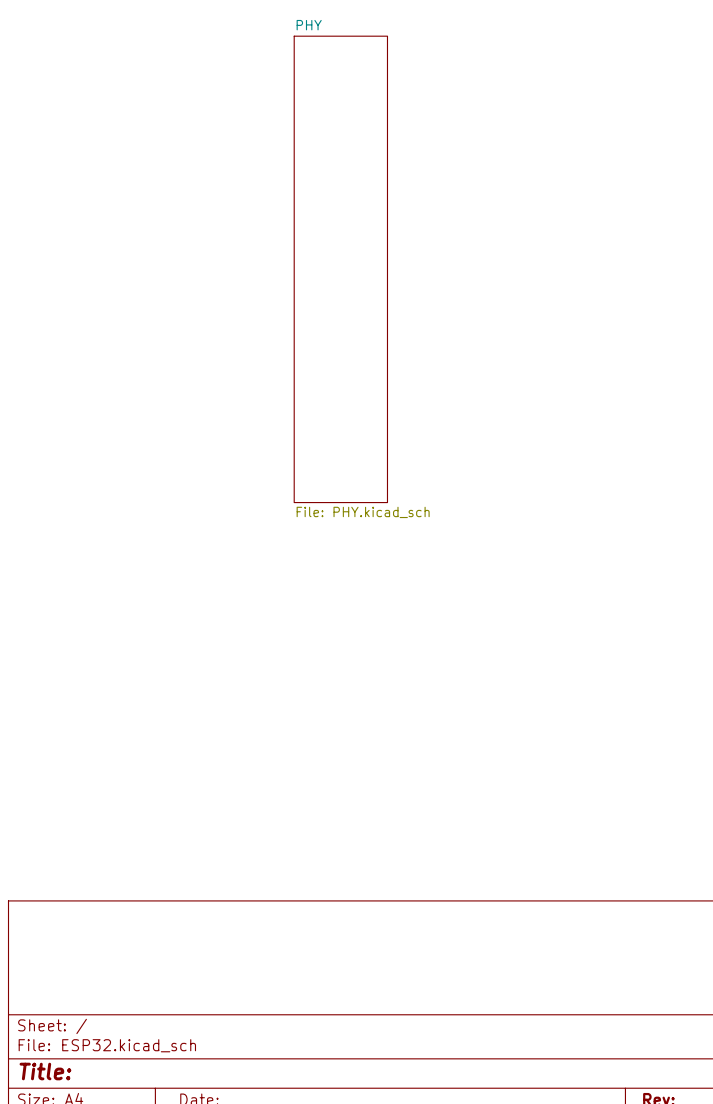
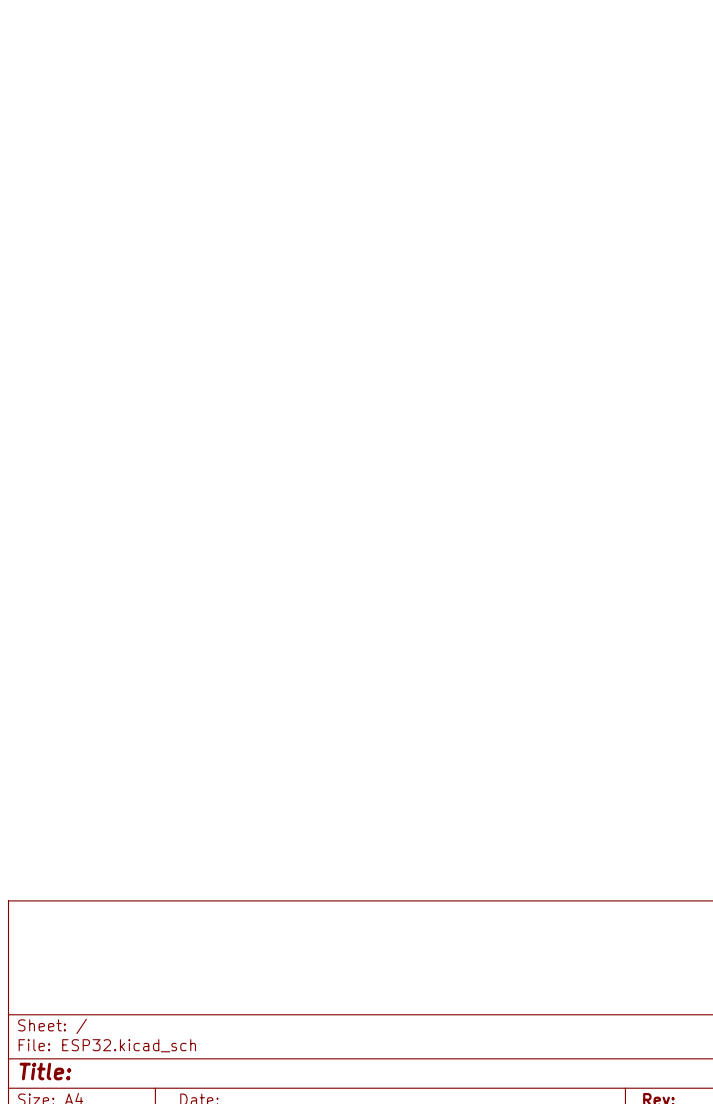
sheet PHY: File: PHY.kicad_sch (340, 269) -> none

